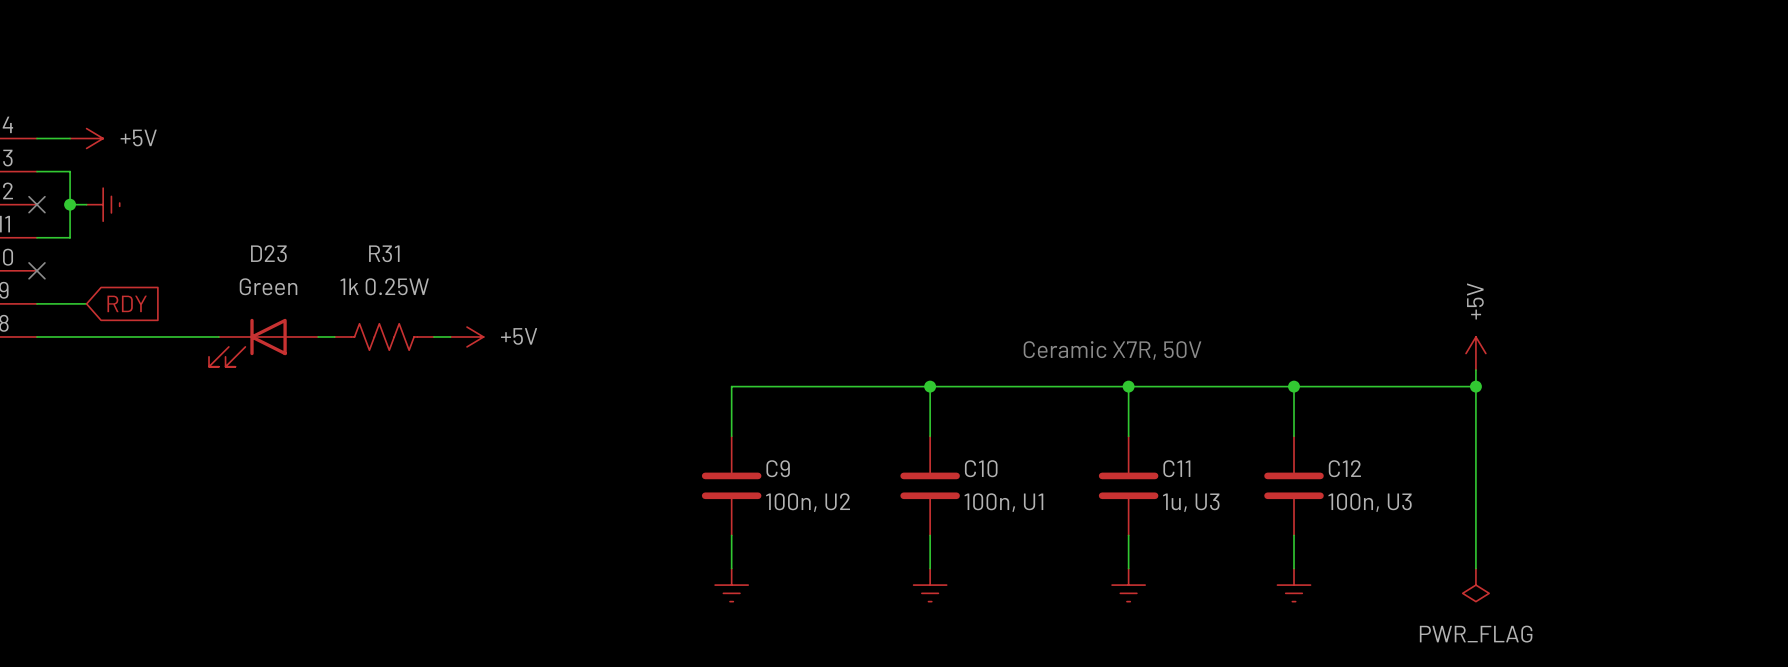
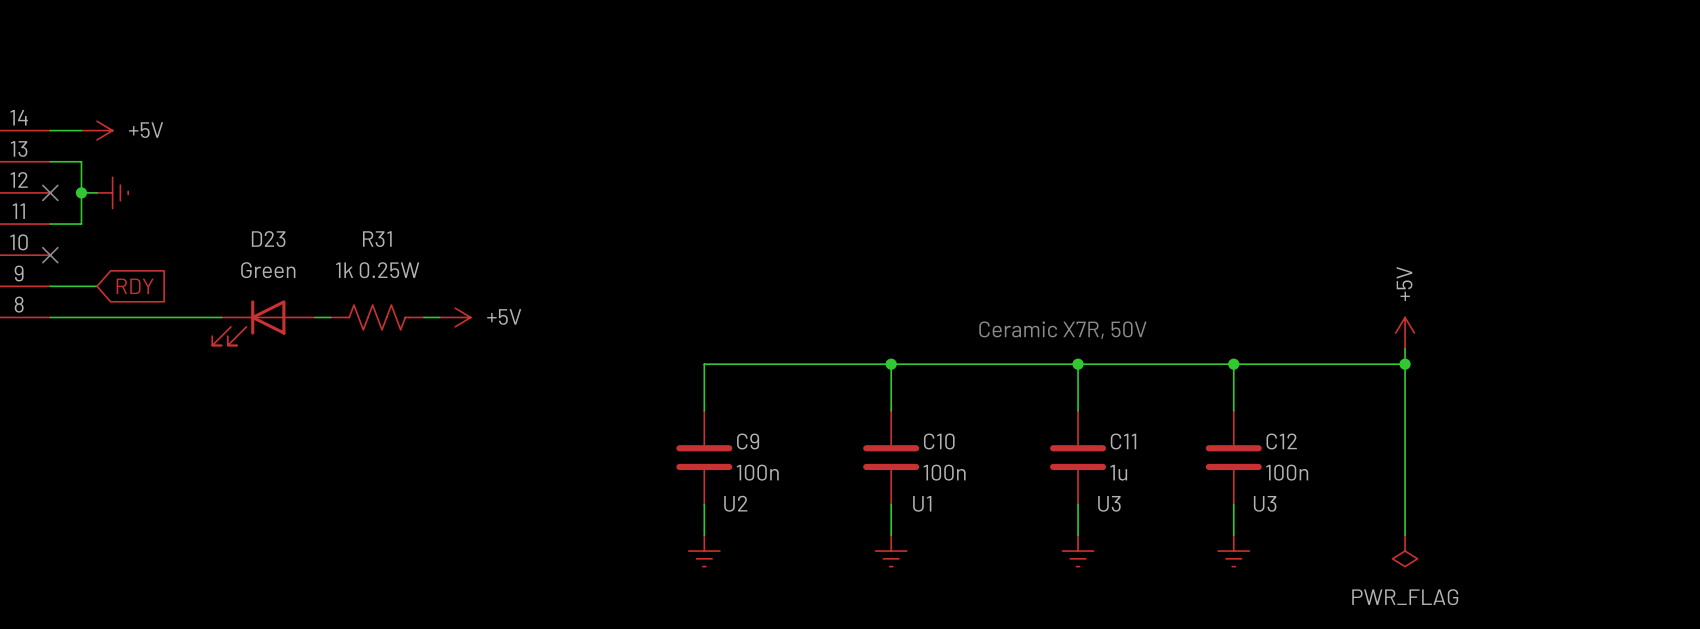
C9 value: 100n, U2 (808, 502) -> 100n (757, 472)
C10 value: 100n, U1 (1003, 502) -> 100n (944, 472)
C11 value: 1u, U3 (1191, 502) -> 1u (1118, 472)
C12 value: 100n, U3 (1370, 502) -> 100n (1287, 472)
C9 text: none -> U2 (735, 503)
C10 text: none -> U1 (922, 503)
C11 text: none -> U3 (1109, 503)
C12 text: none -> U3 (1265, 503)

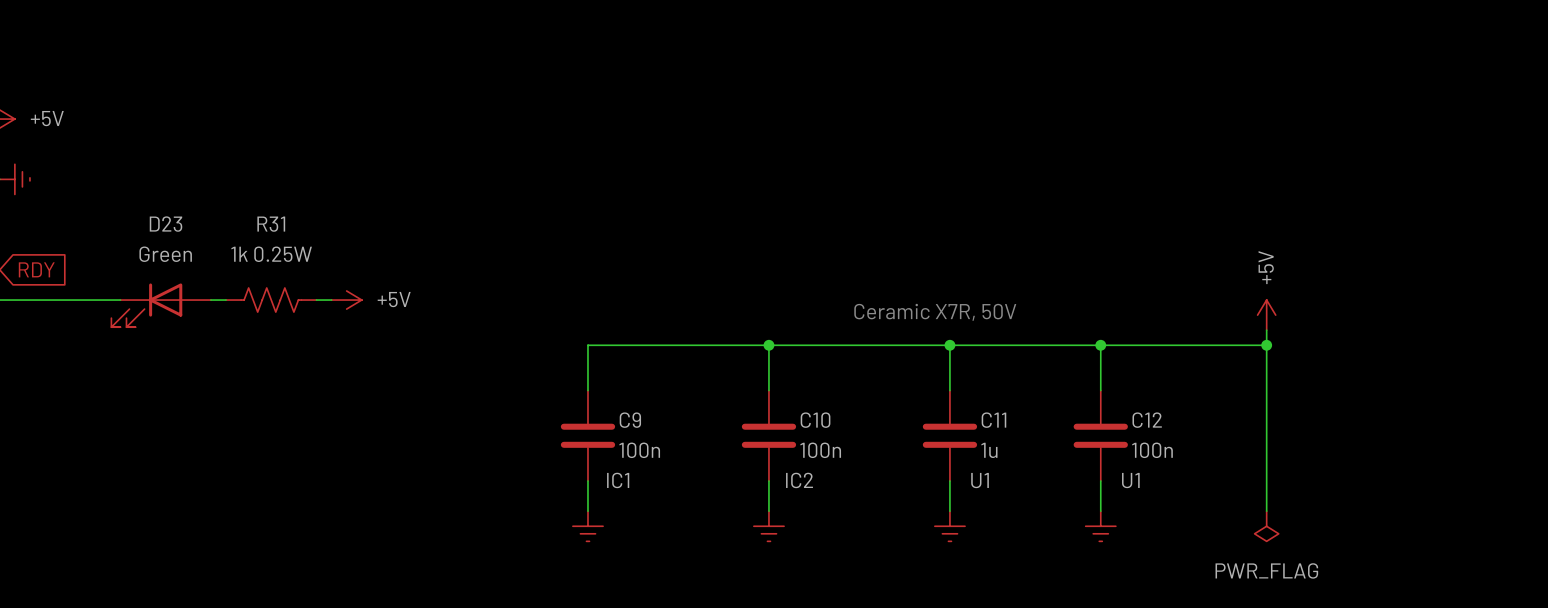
C9 text: U2 (735, 503) -> IC1 (618, 480)
C10 text: U1 (922, 503) -> IC2 (799, 480)
C11 text: U3 (1109, 503) -> U1 (980, 480)
C12 text: U3 (1265, 503) -> U1 (1130, 480)

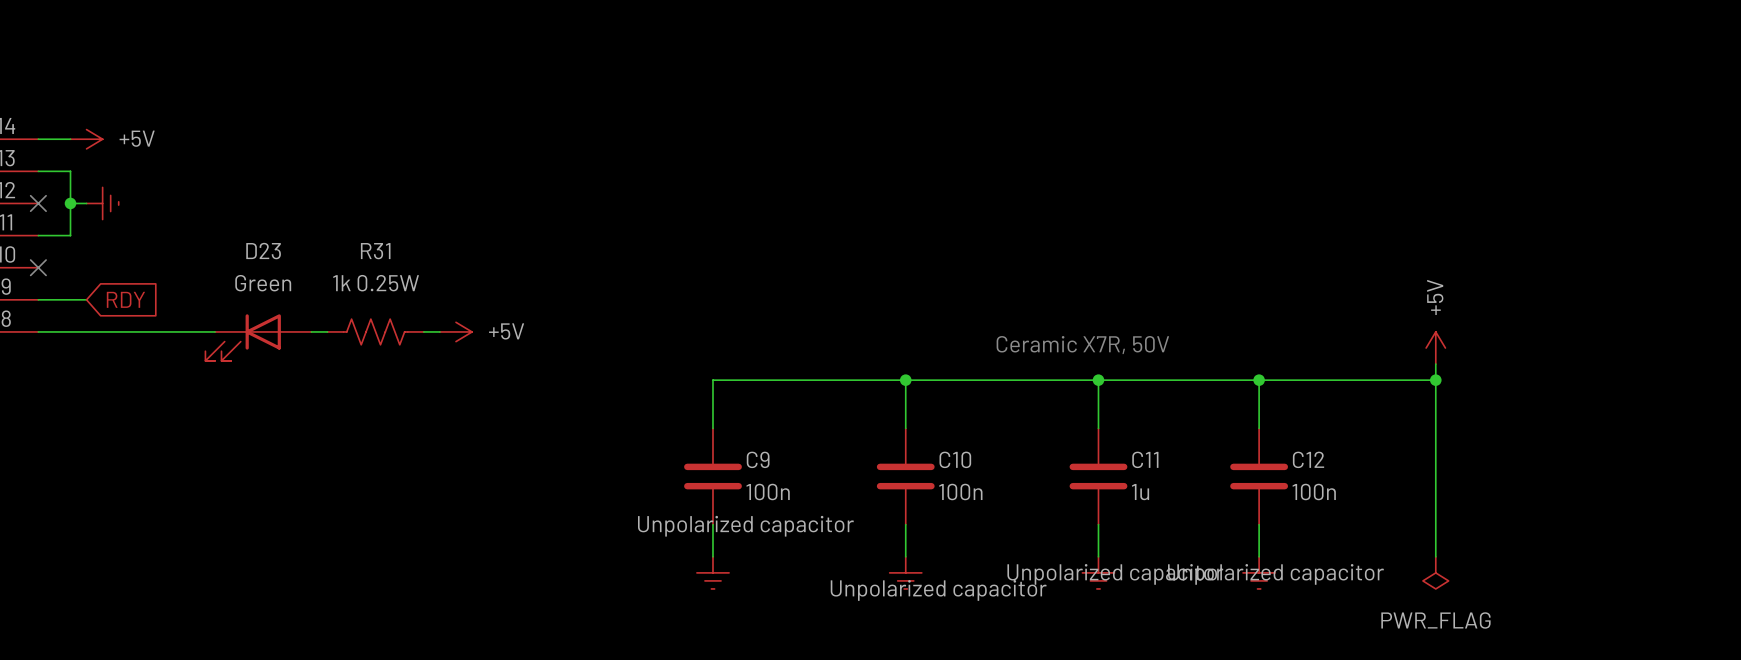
C9 text: IC1 (618, 480) -> Unpolarized capacitor (745, 526)
C10 text: IC2 (799, 480) -> Unpolarized capacitor (938, 590)
C11 text: U1 (980, 480) -> Unpolarized capacitor (1115, 574)
C12 text: U1 (1130, 480) -> Unpolarized capacitor (1275, 574)

